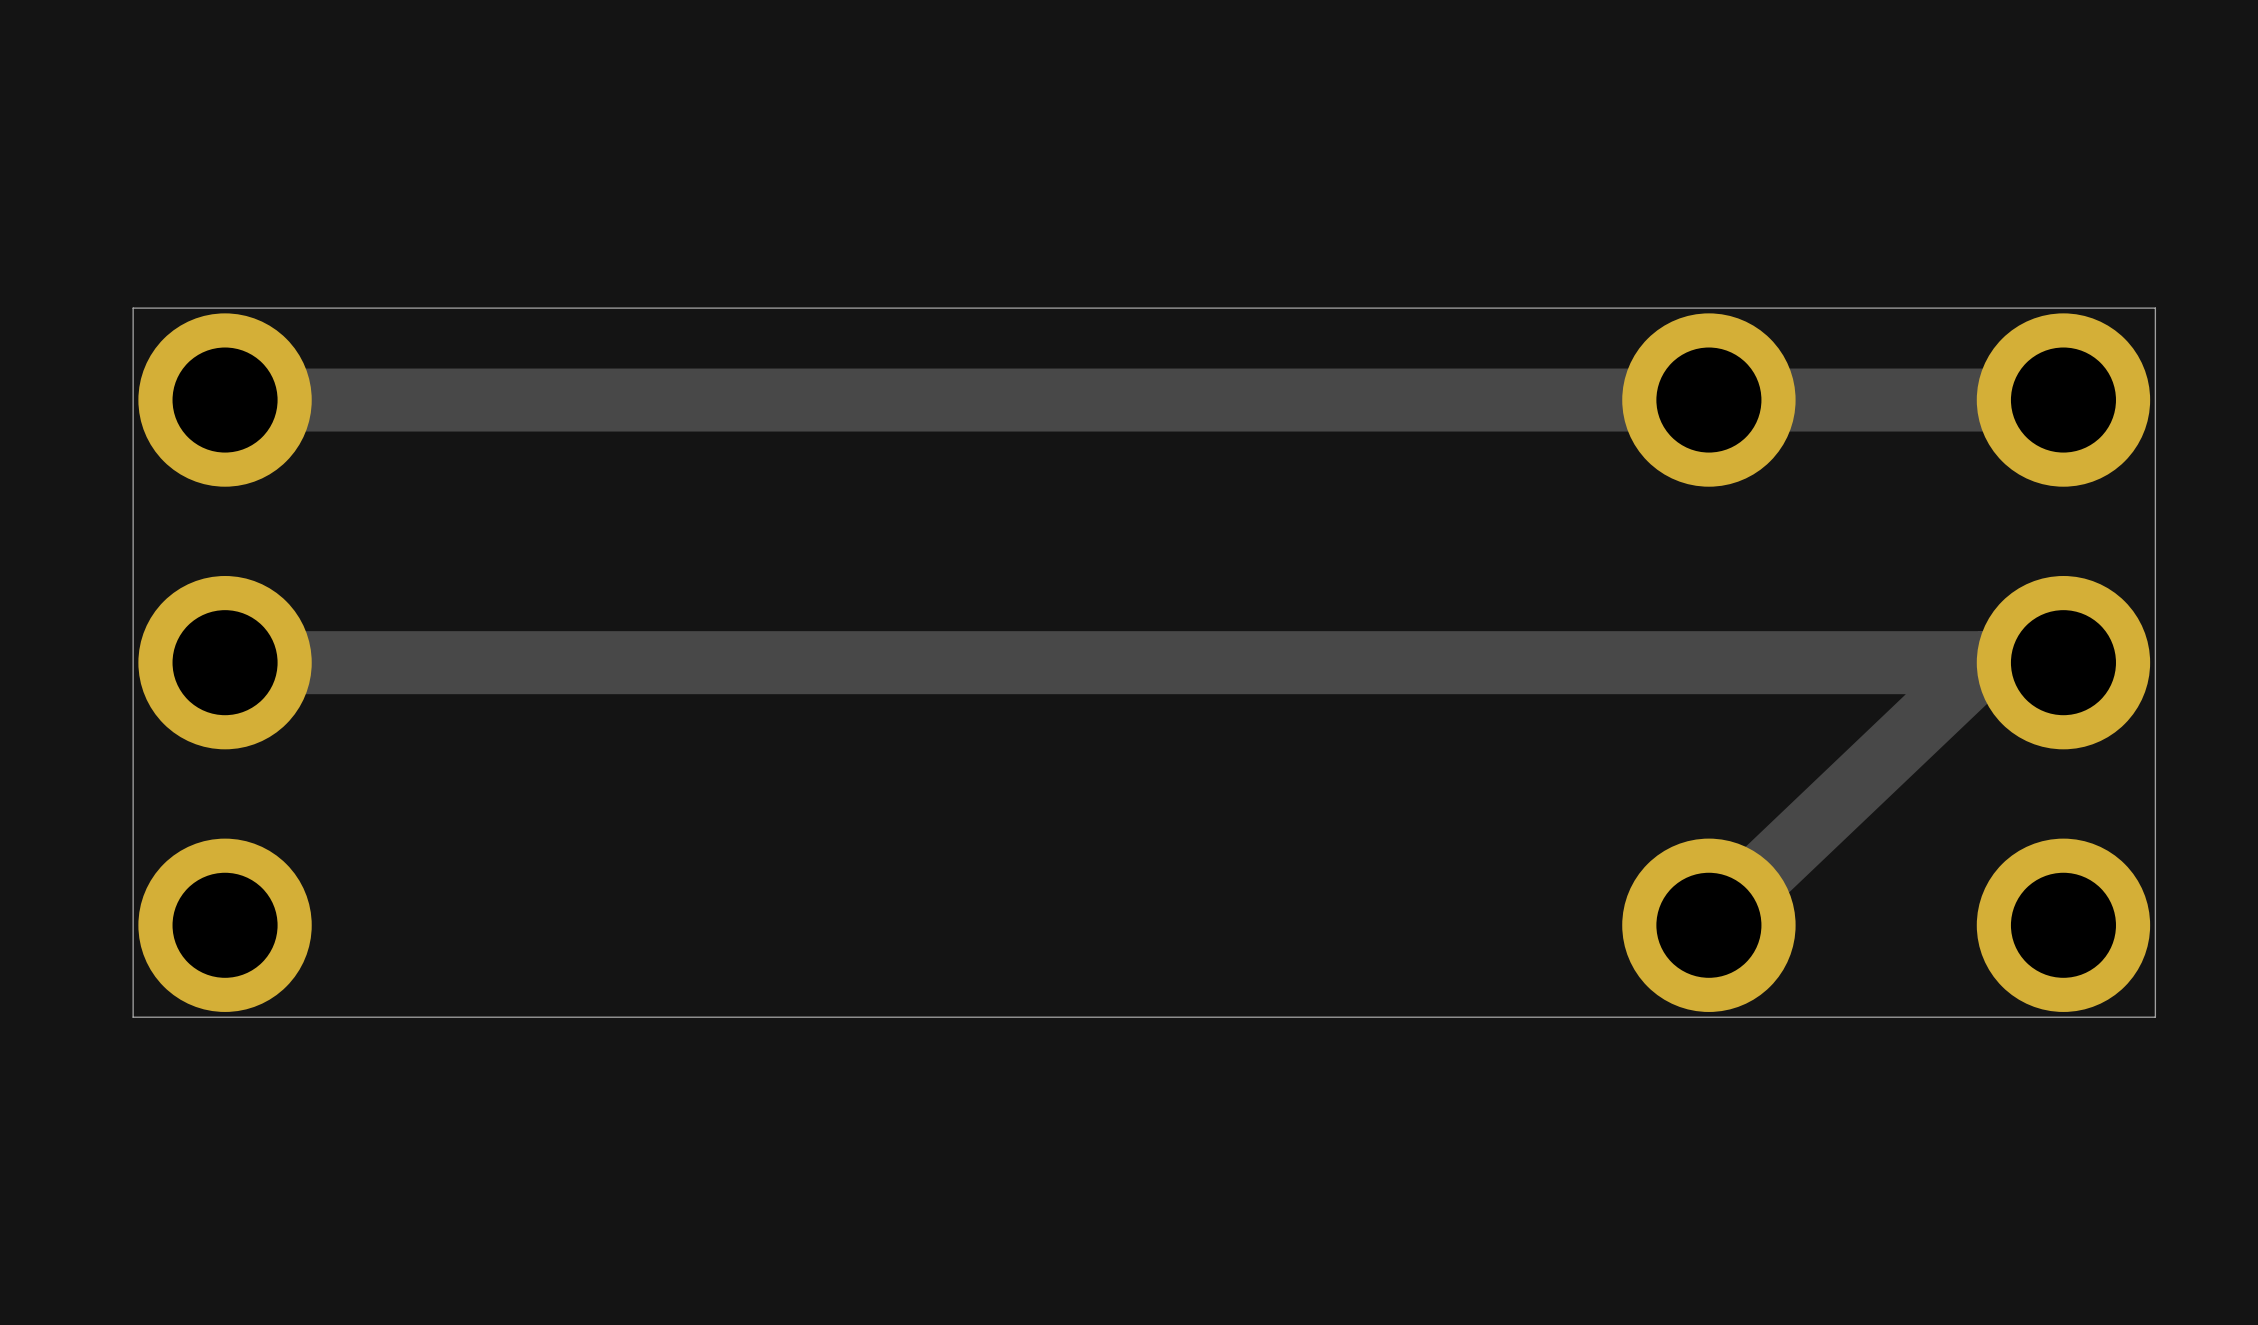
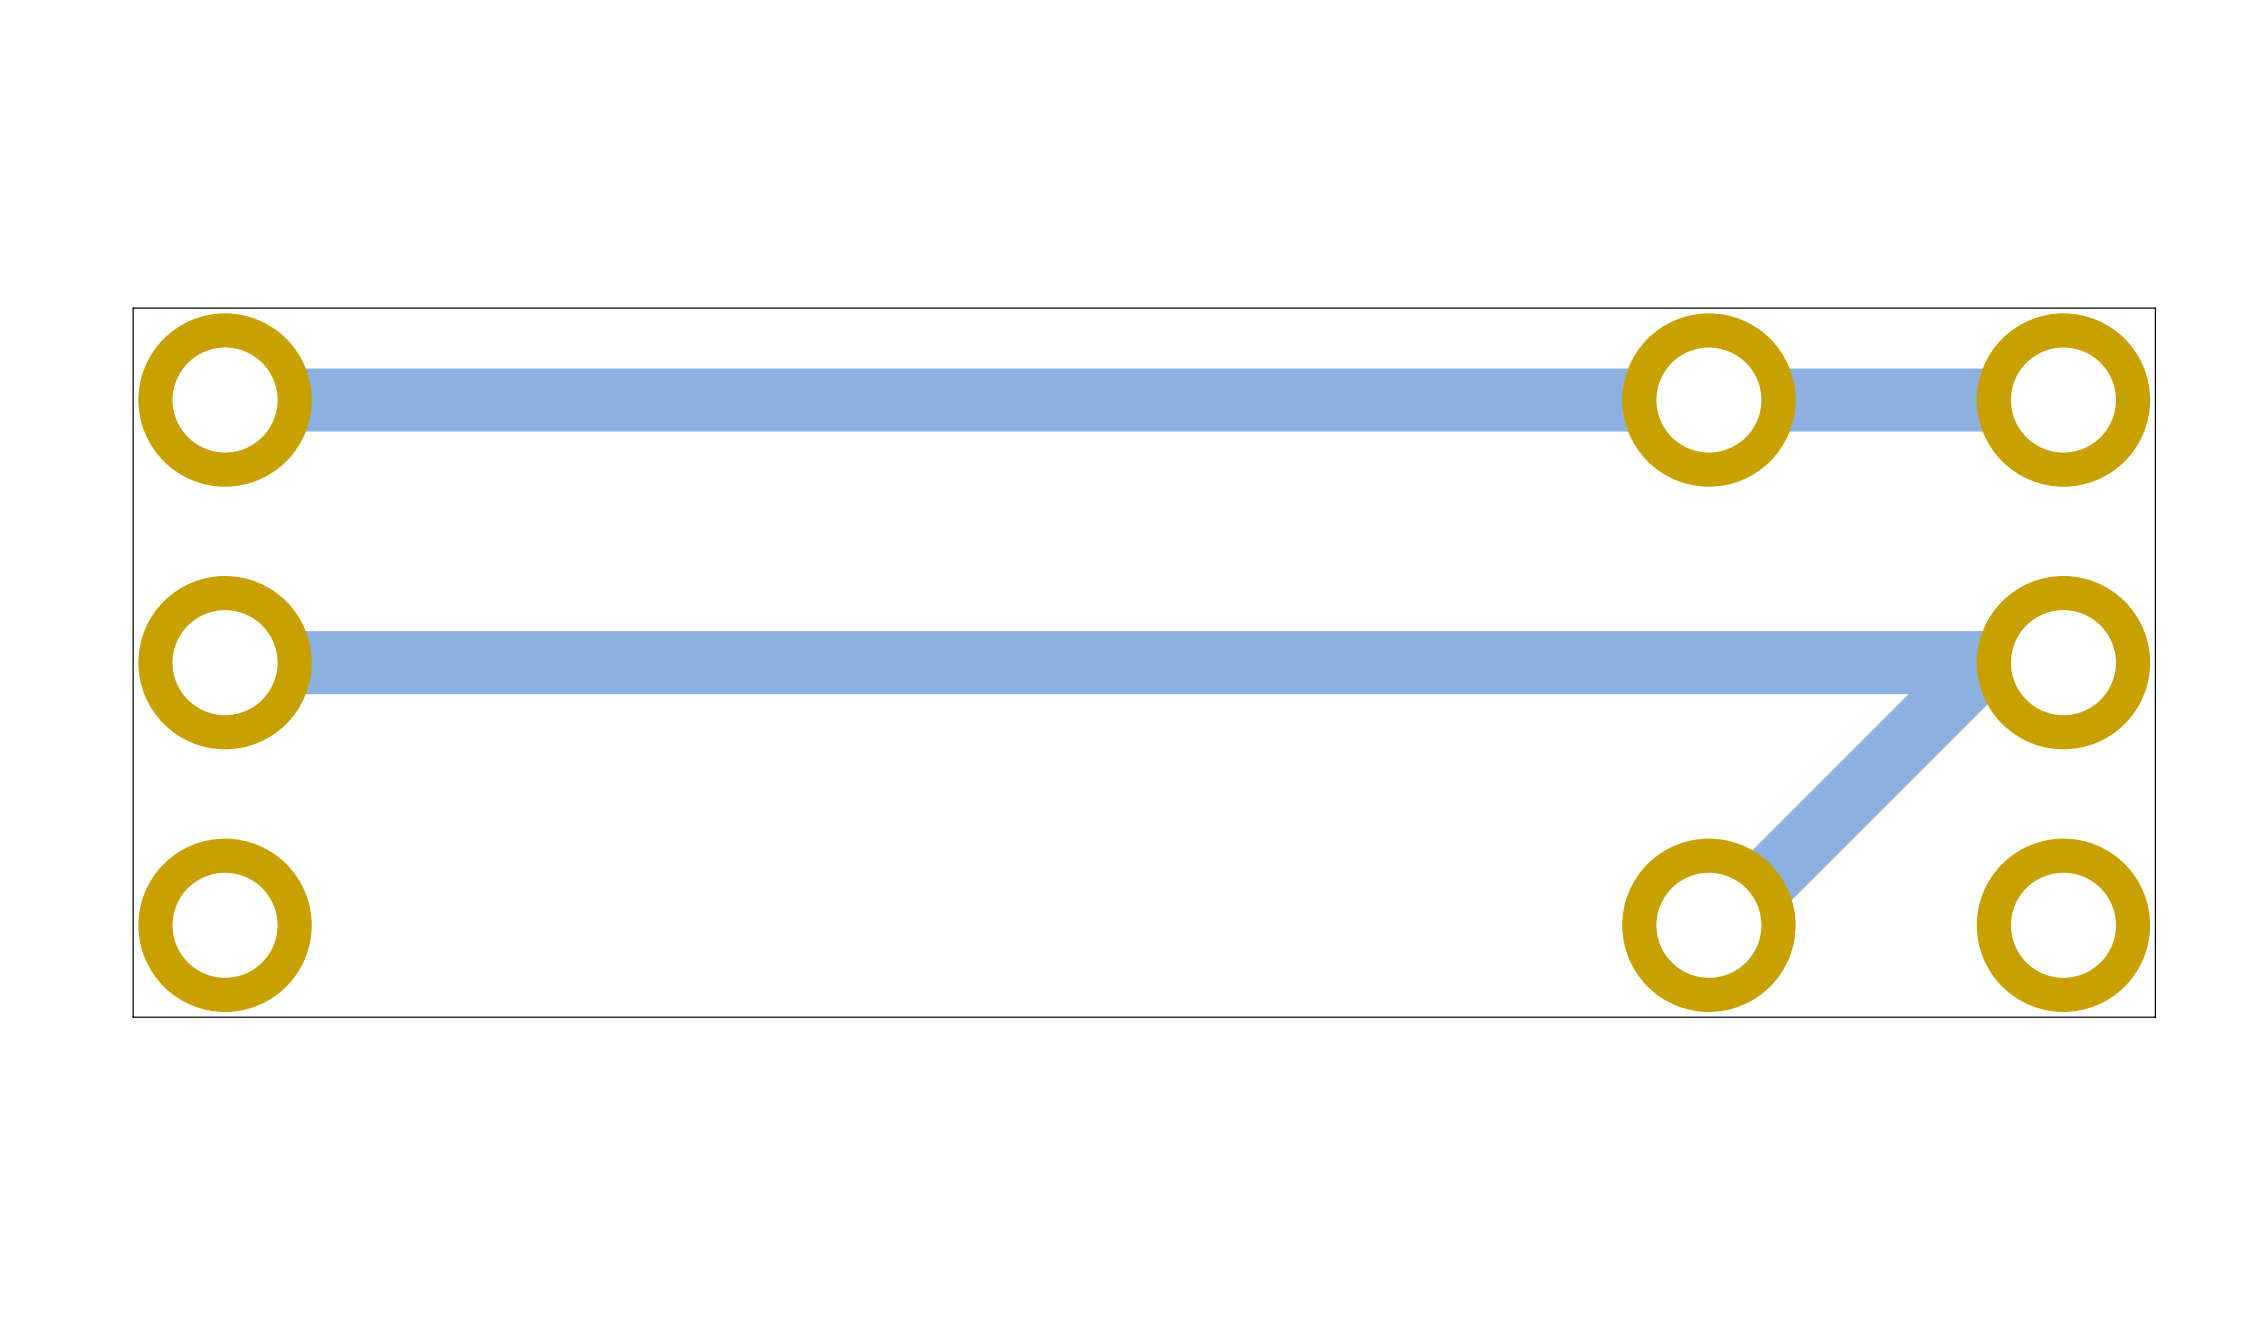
track: (1984, 662) (1708, 925) -> (1984, 662) (1722, 925)

